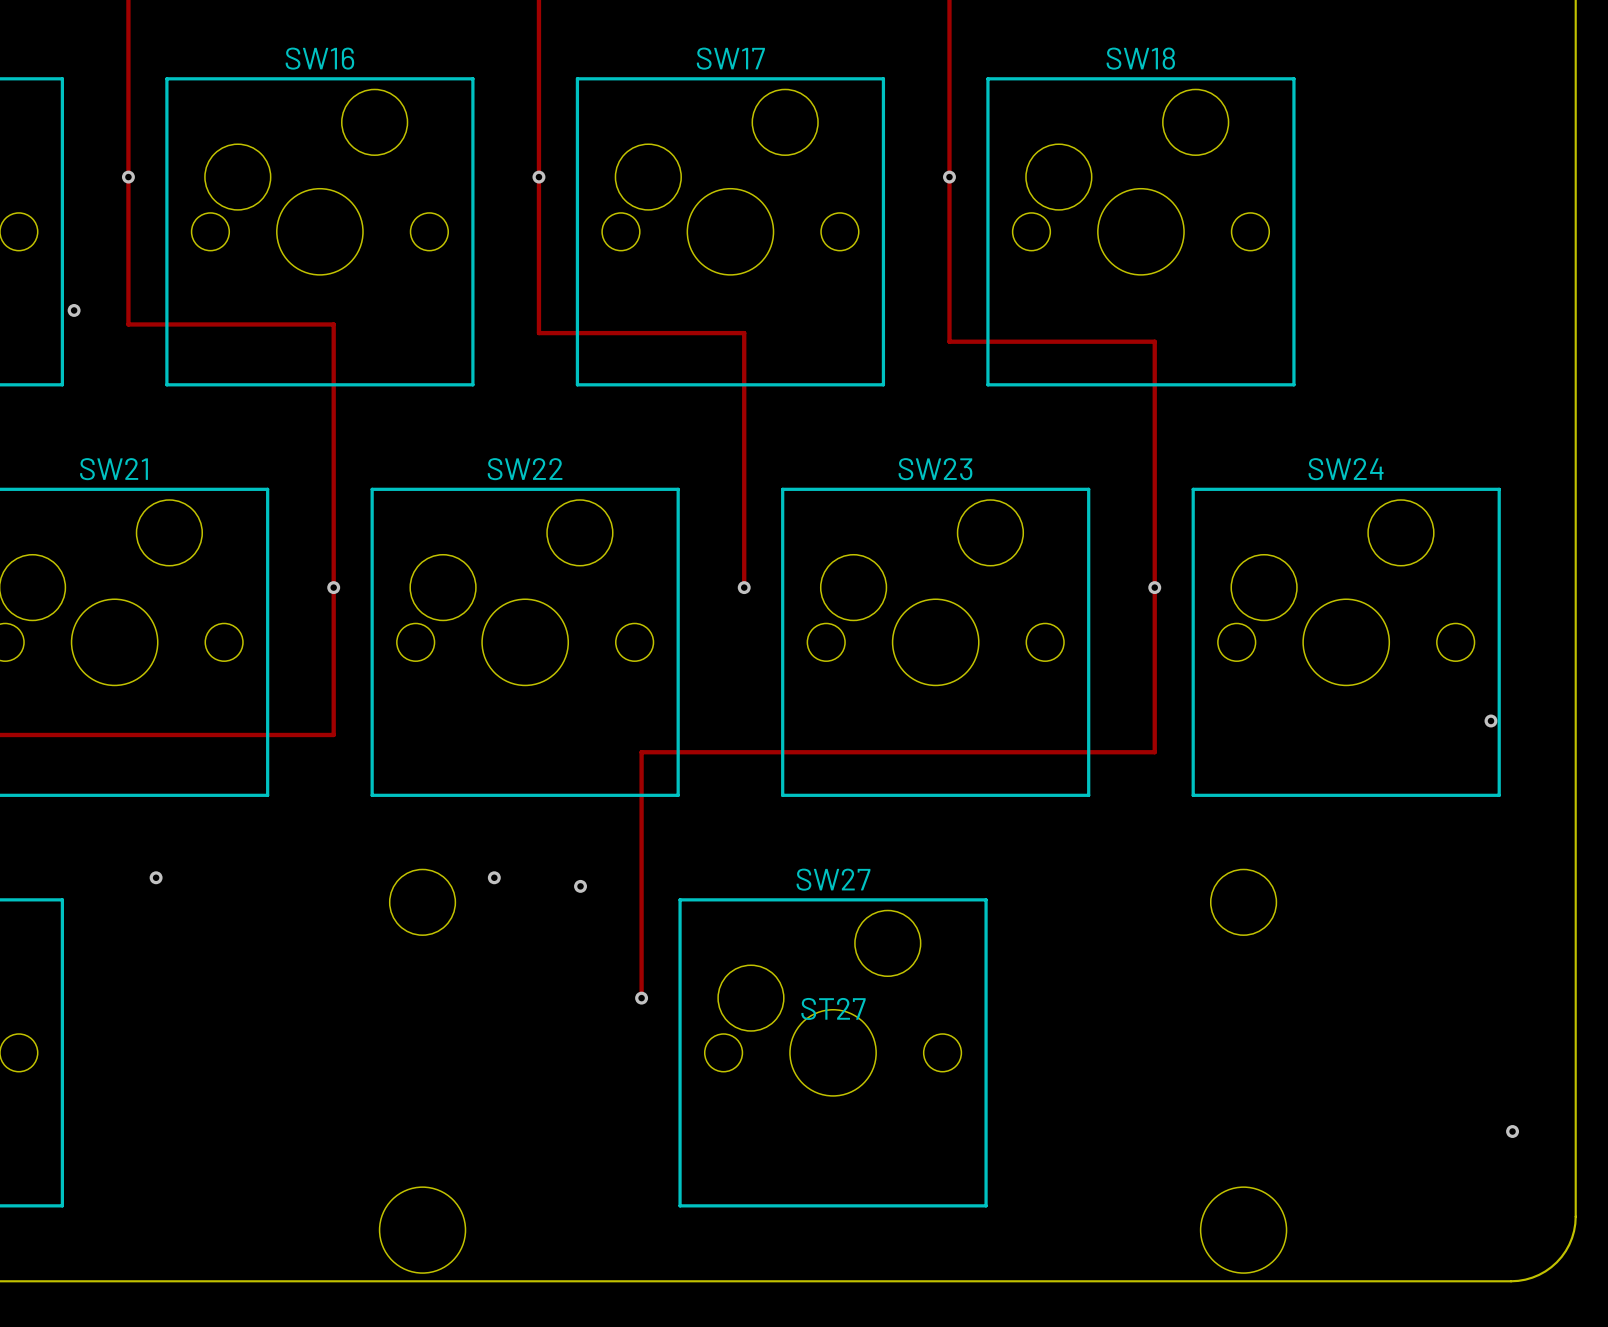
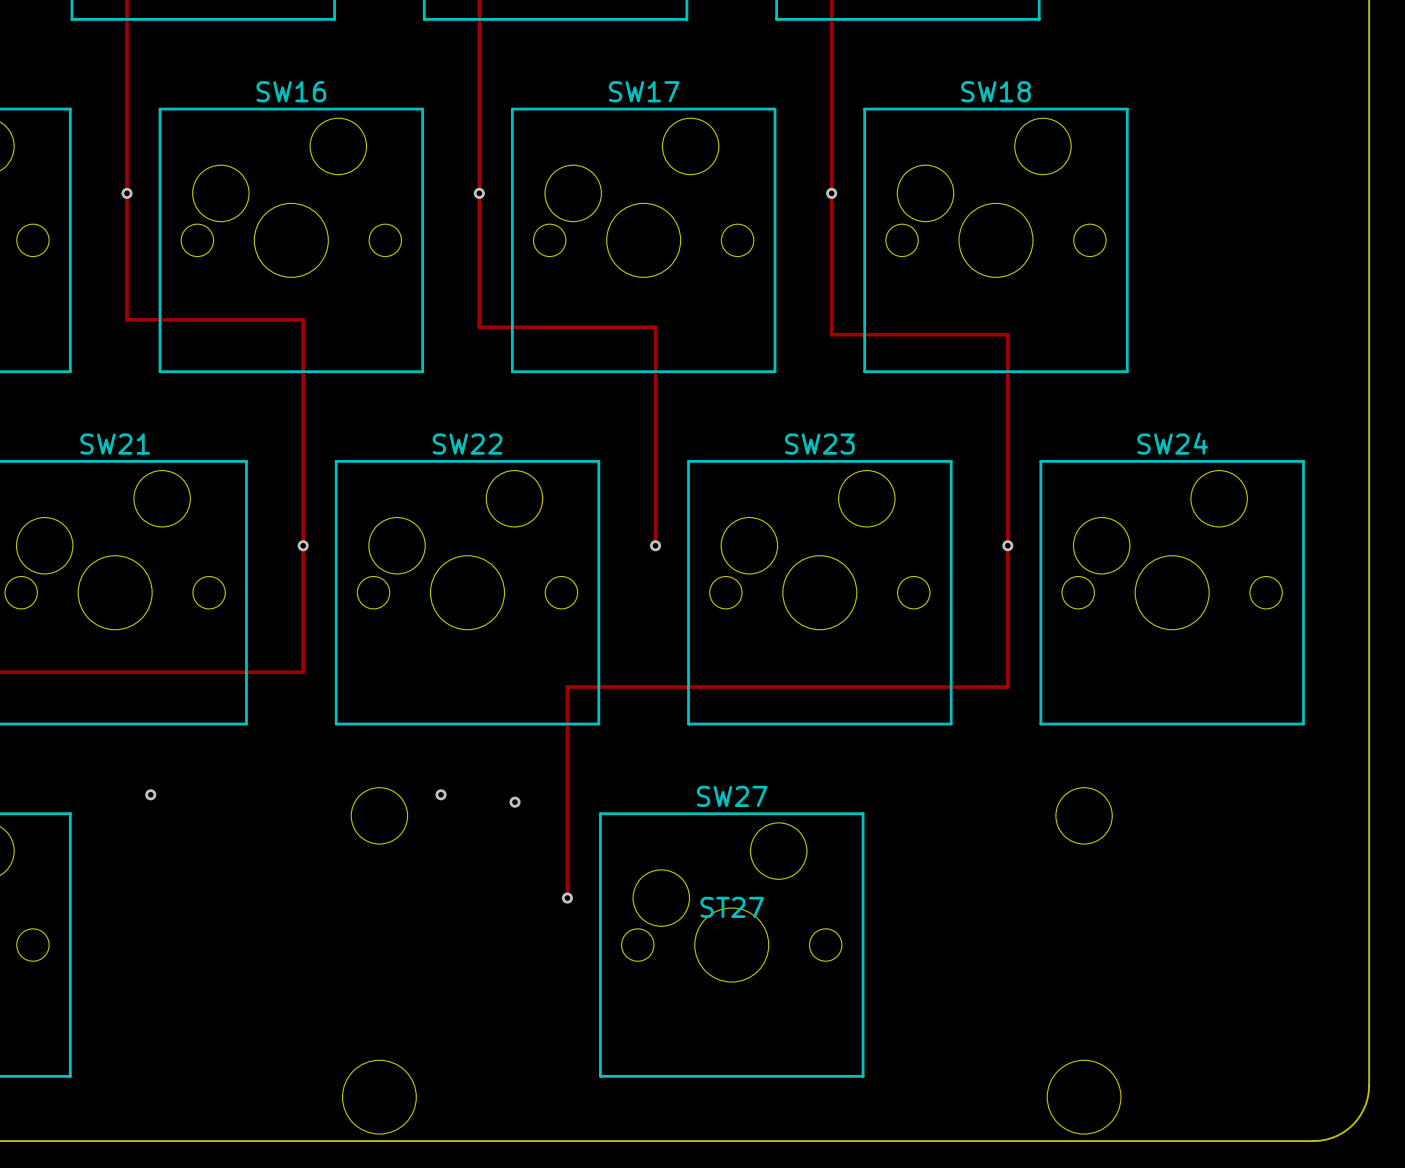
via: (74, 310) -> none
via: (1491, 720) -> none
via: (1512, 1131) -> none

